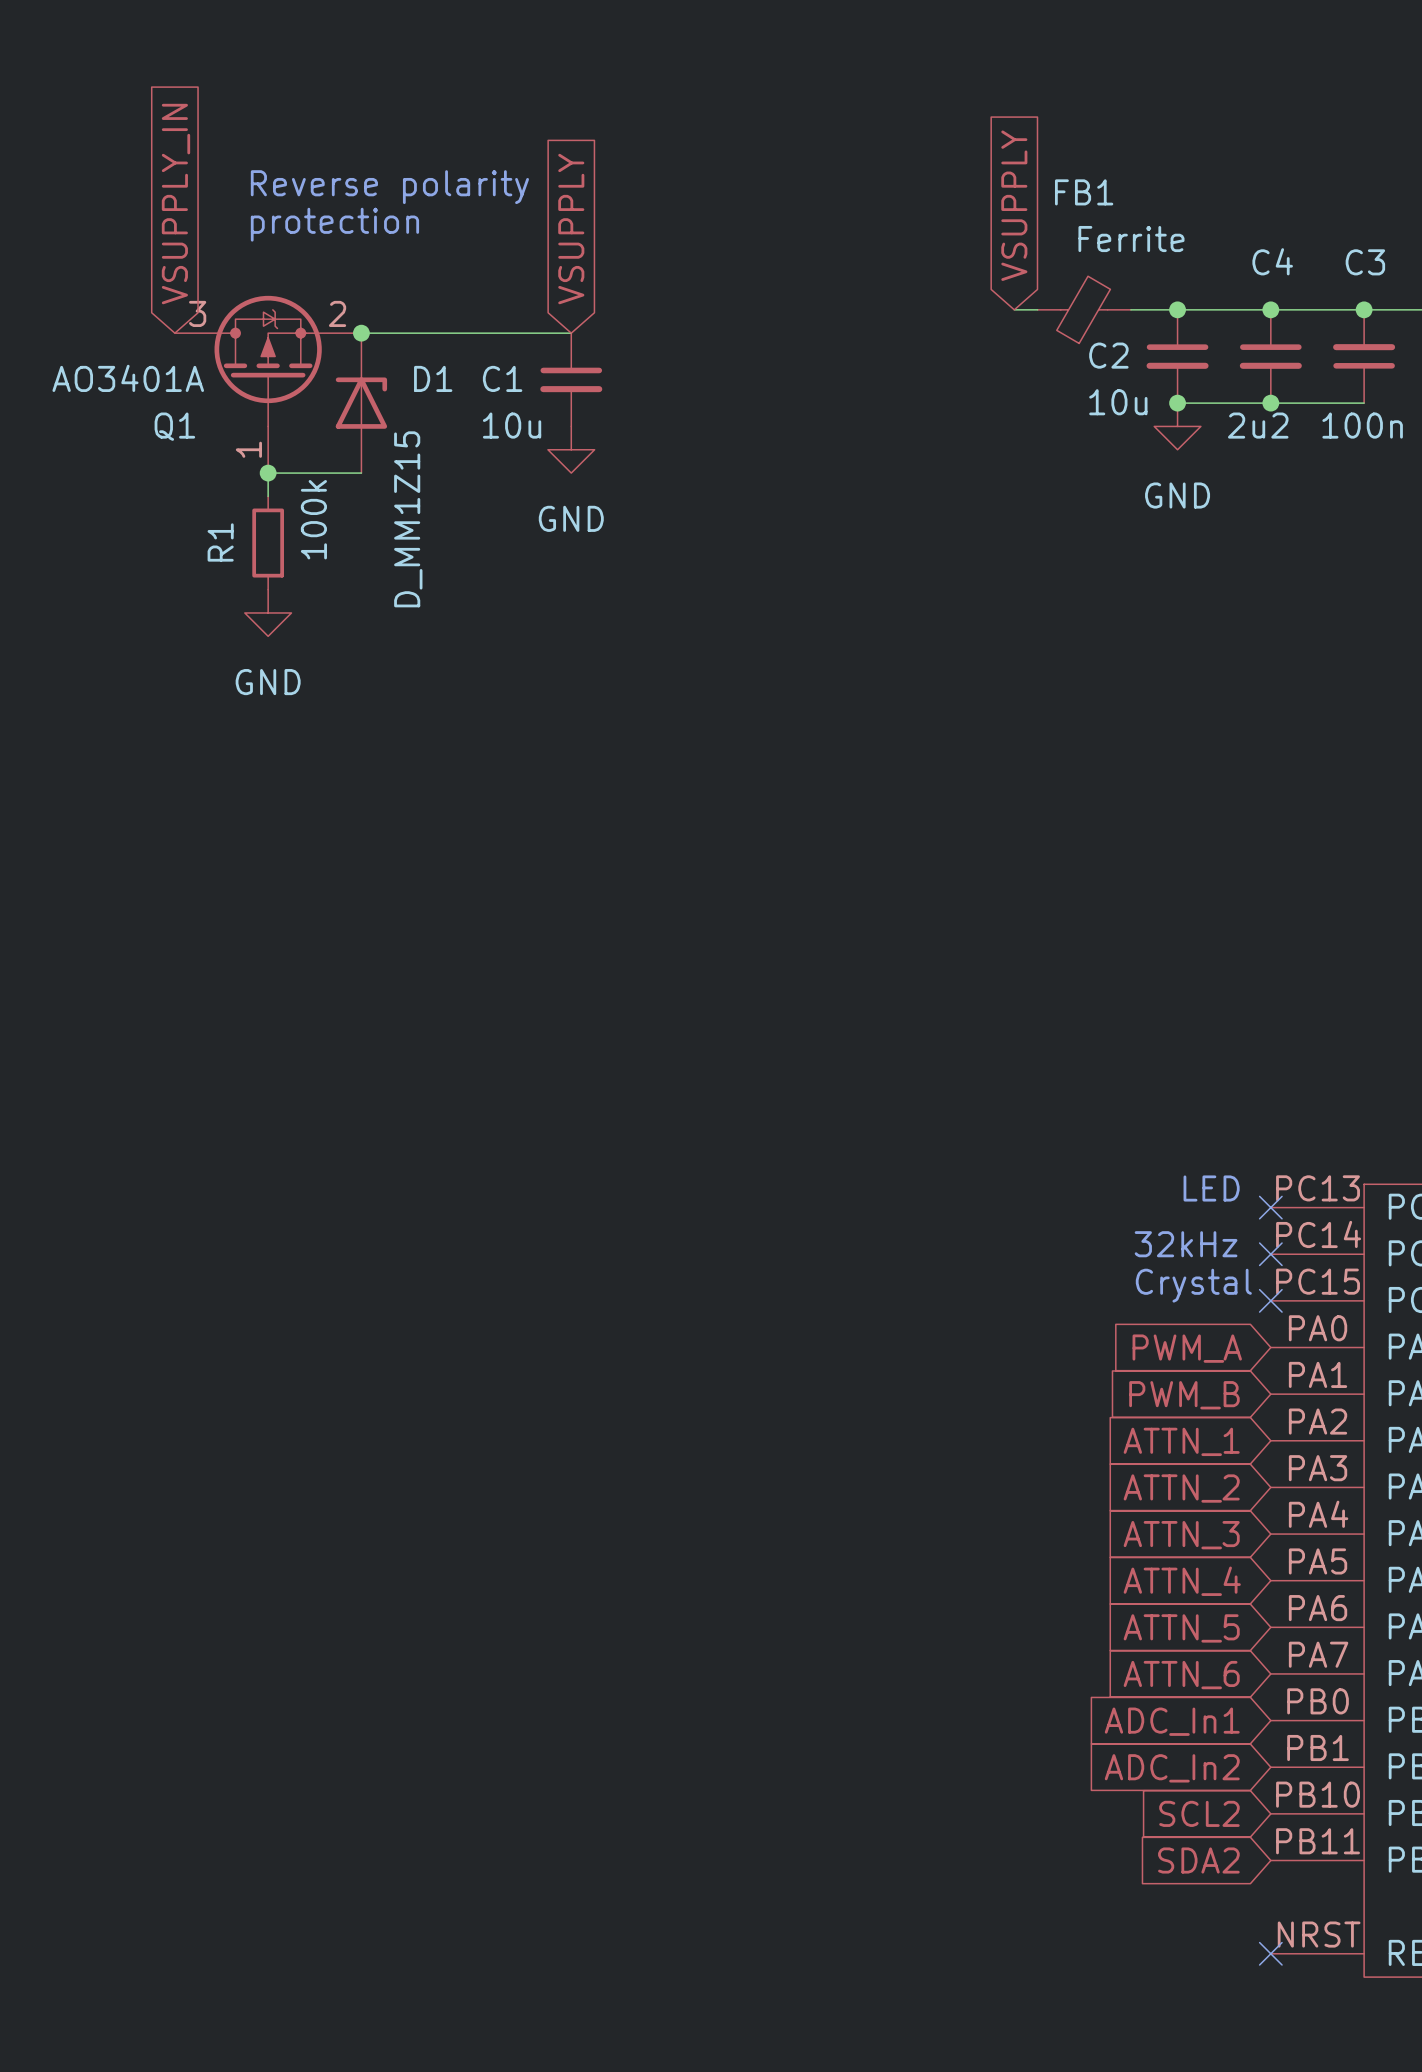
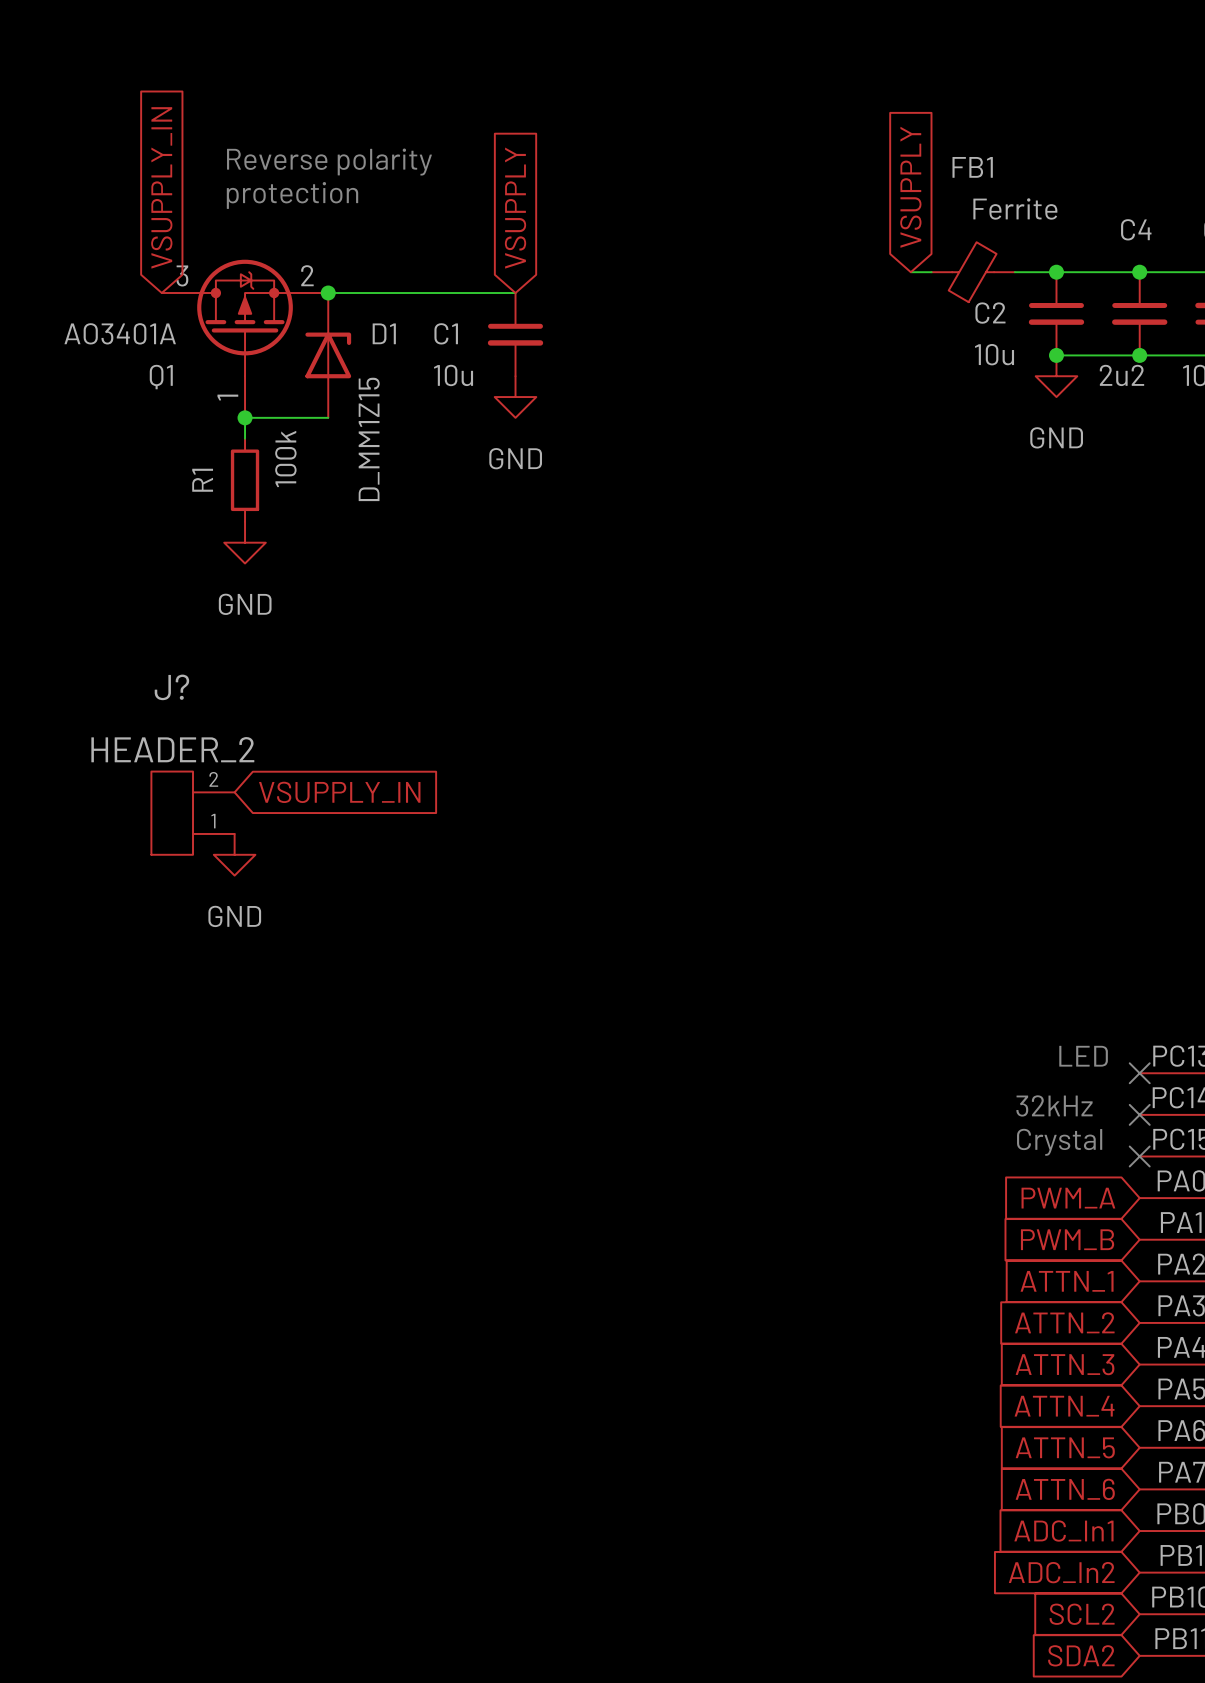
global label: none -> VSUPPLY_IN (339, 792)
J?: none -> HEADER_2 (193, 813)
power symbol: none -> GND (234, 854)

